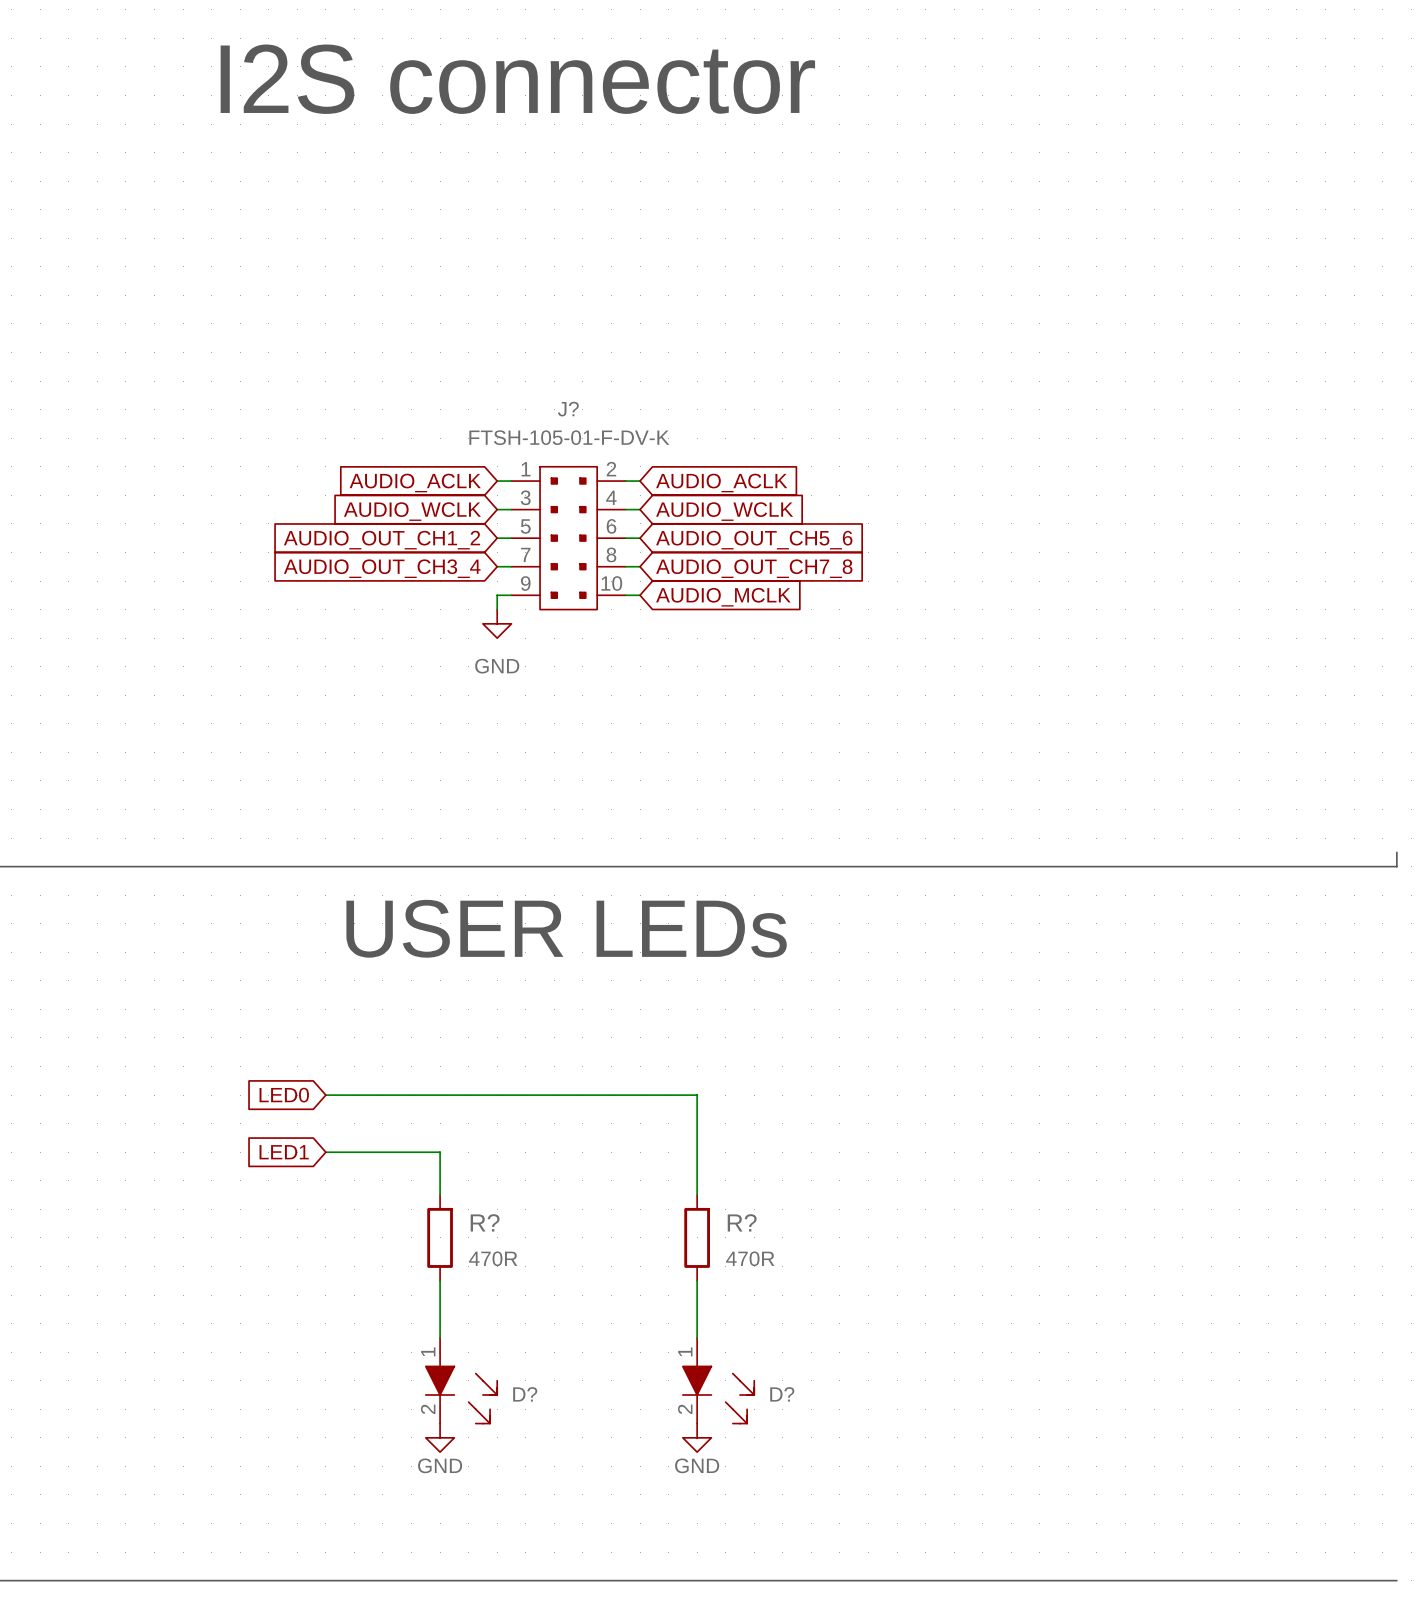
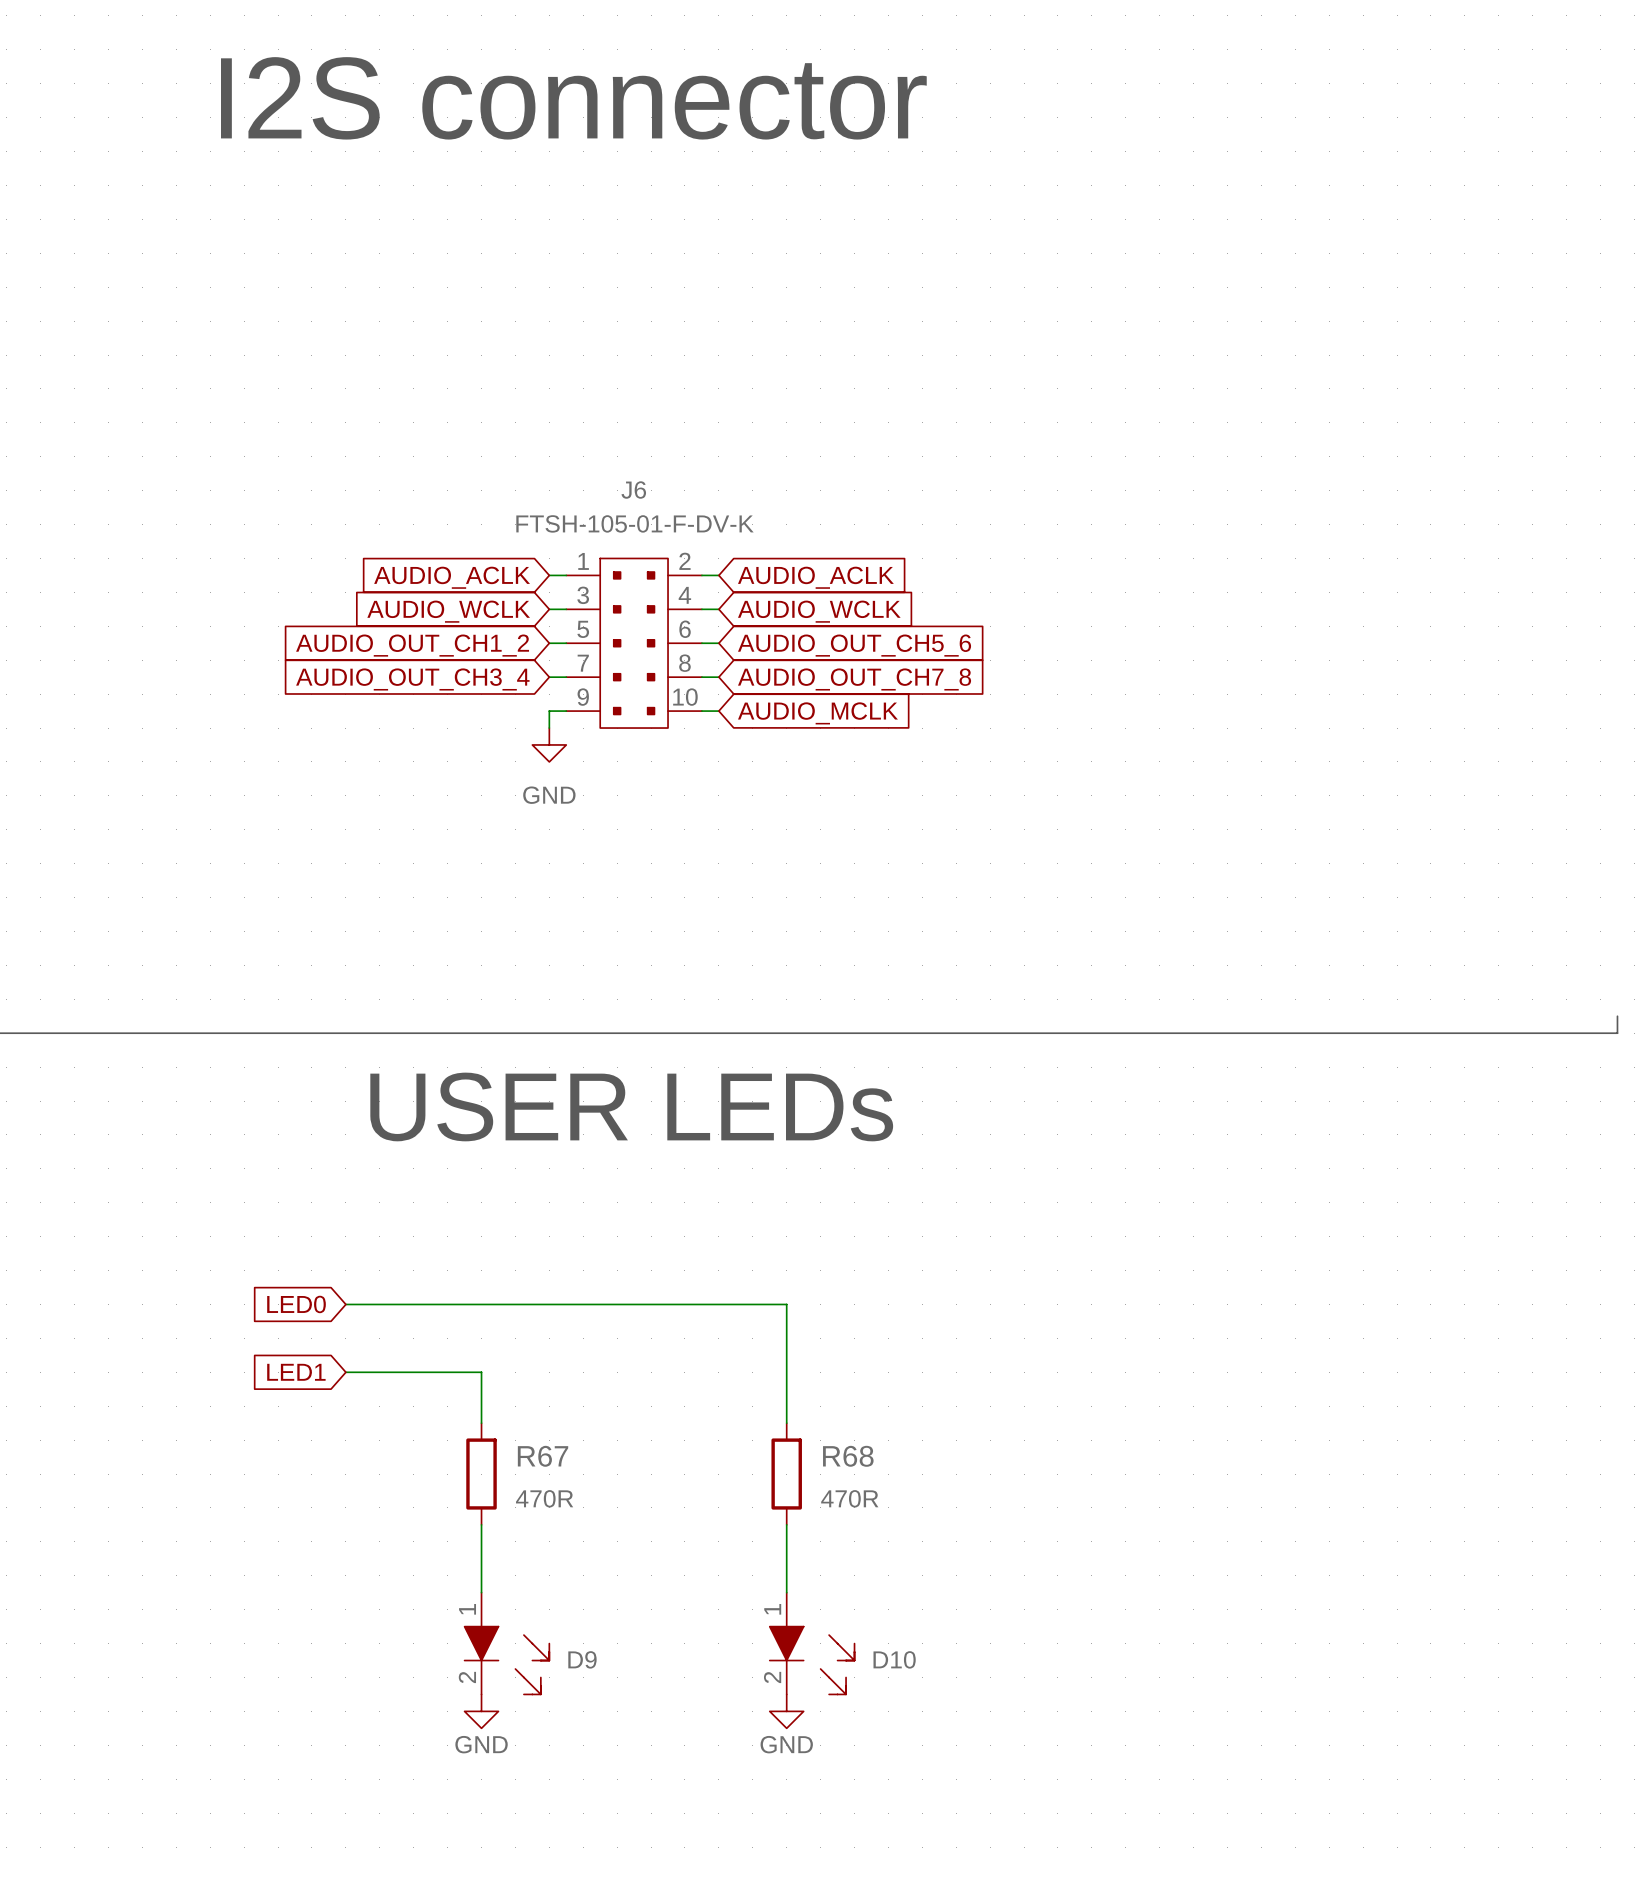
J? name: J? (568, 409) -> J6 (633, 490)
R? name: R? (485, 1222) -> R67 (543, 1456)
R? name: R? (742, 1222) -> R68 (848, 1456)
D? name: D? (525, 1394) -> D9 (582, 1659)
D? name: D? (782, 1394) -> D10 (894, 1659)

